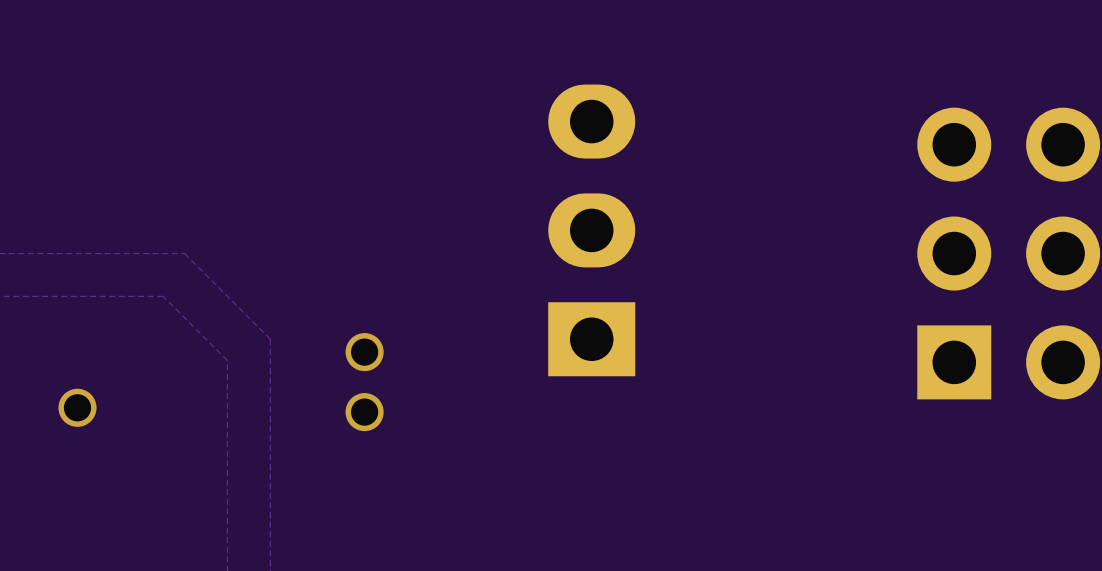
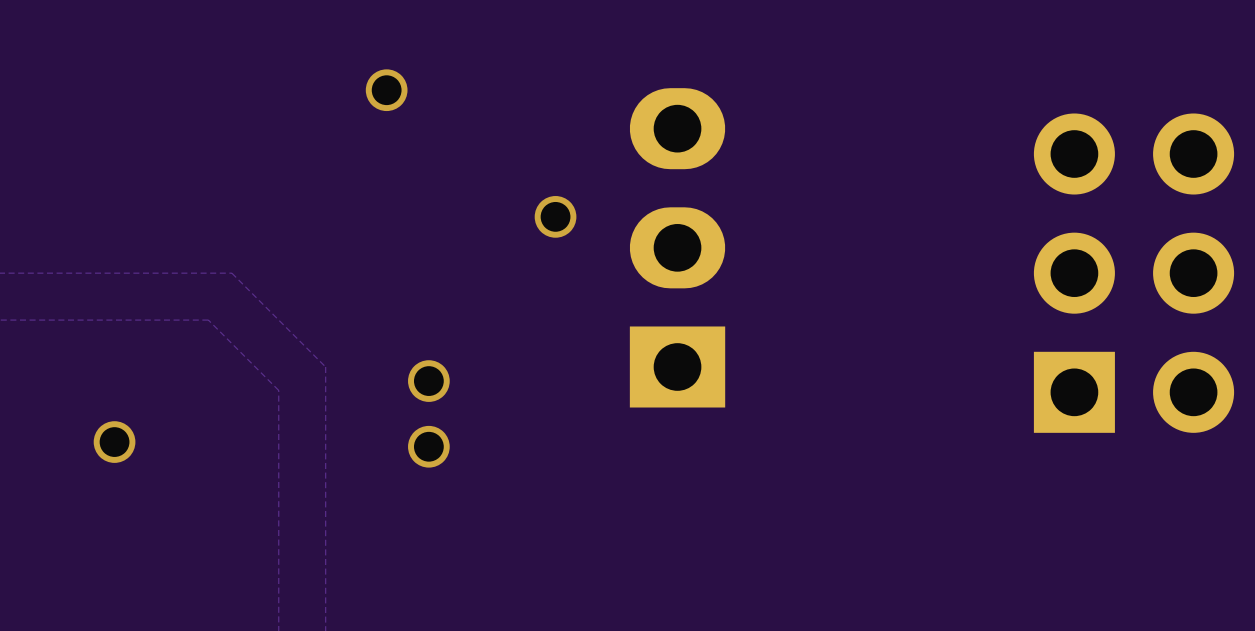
via: none -> (386, 90)
via: none -> (555, 216)

